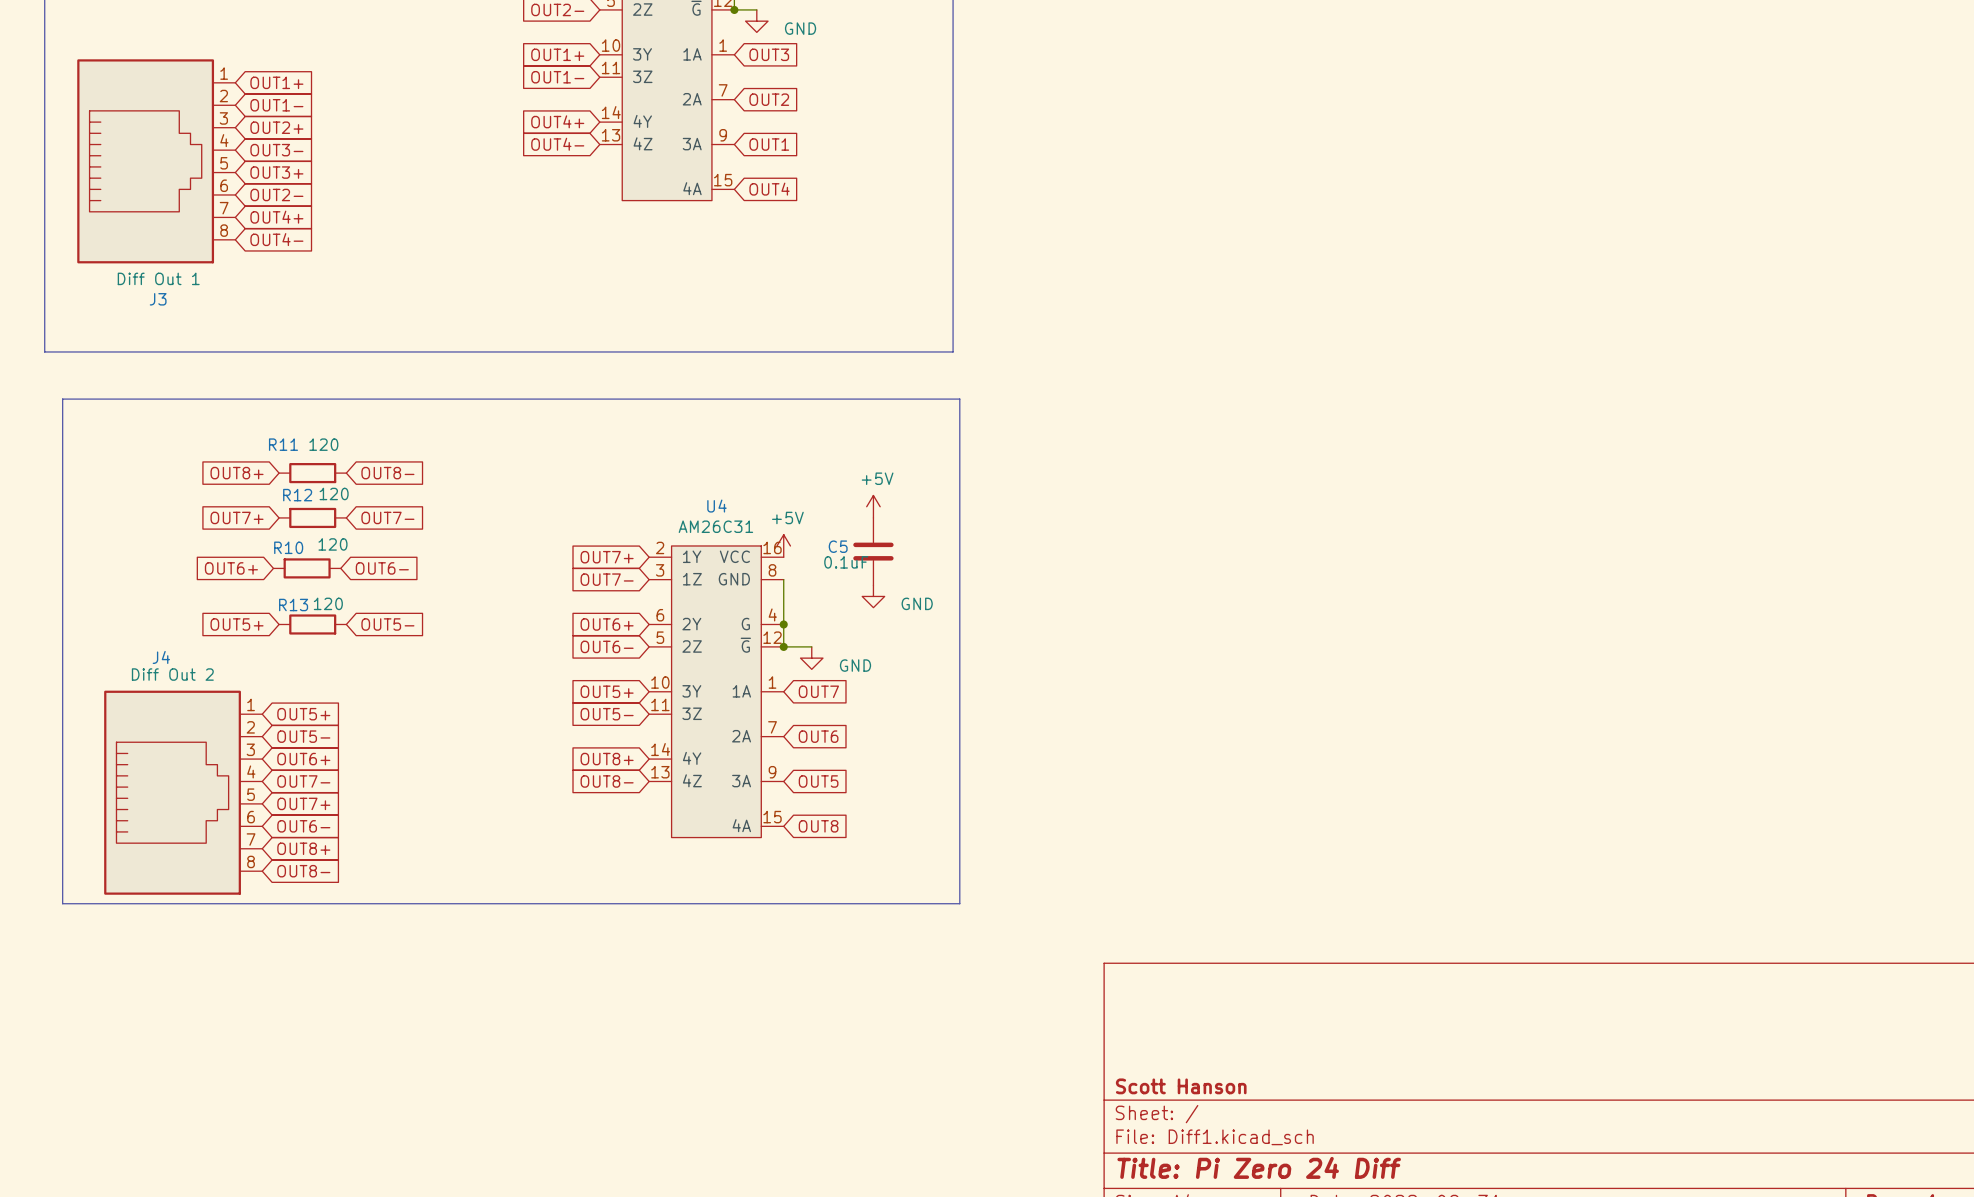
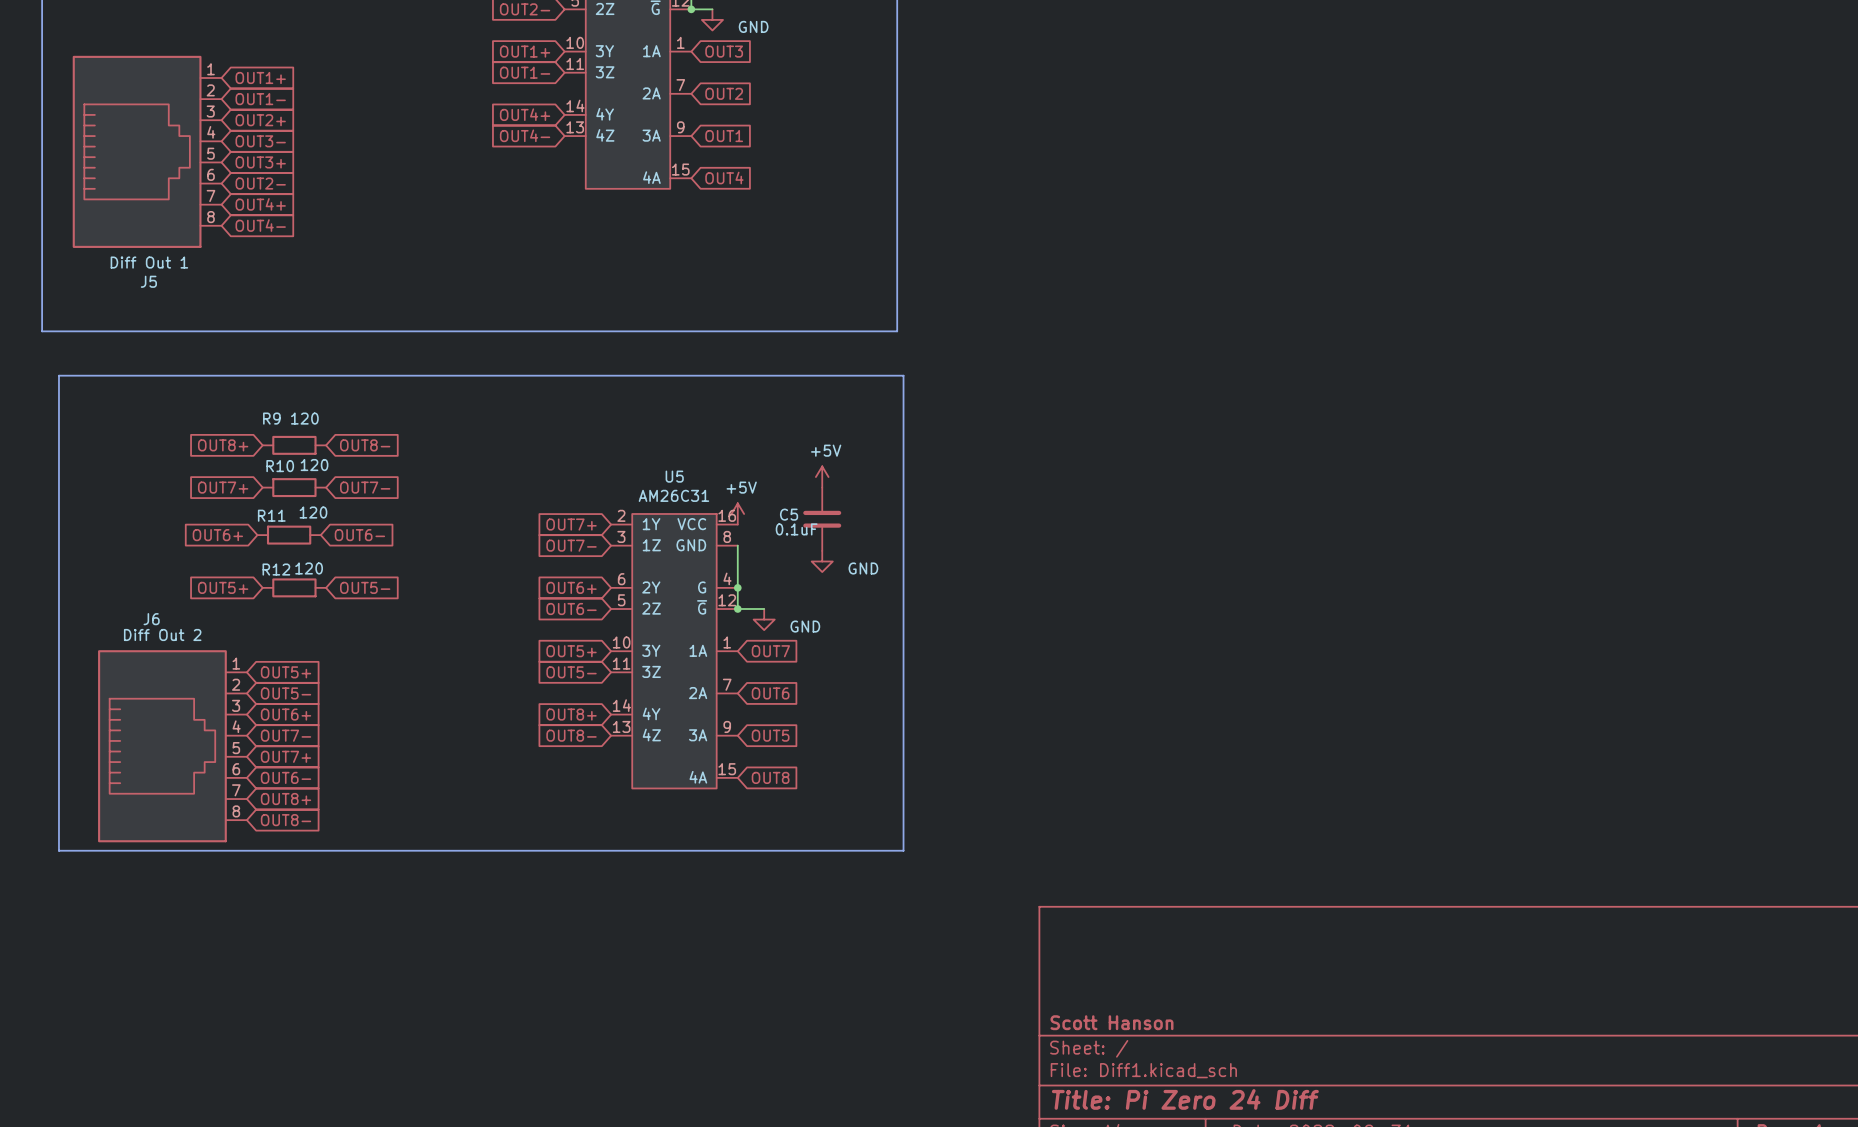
J3 name: J3 (158, 299) -> J5 (148, 281)
R11 name: R11 (283, 444) -> R9 (271, 418)
R12 name: R12 (297, 495) -> R10 (280, 466)
U4 name: U4 (716, 506) -> U5 (674, 476)
R10 name: R10 (288, 547) -> R11 (271, 515)
R13 name: R13 (293, 605) -> R12 (276, 569)
J4 name: J4 (161, 657) -> J6 (151, 619)

